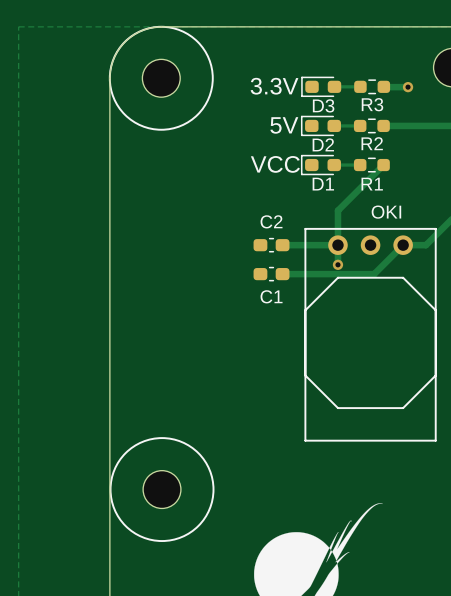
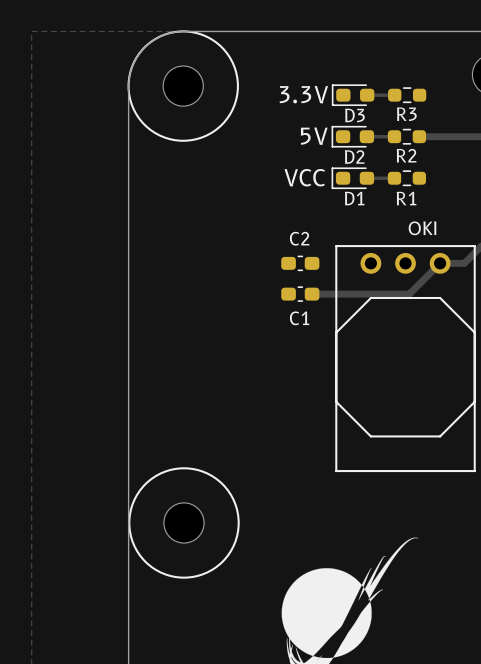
track: (383, 86) (408, 87) -> none
via: (408, 87) -> none
track: (383, 165) (337, 210) (337, 264) -> none
track: (282, 245) (337, 245) -> none
via: (337, 264) -> none

